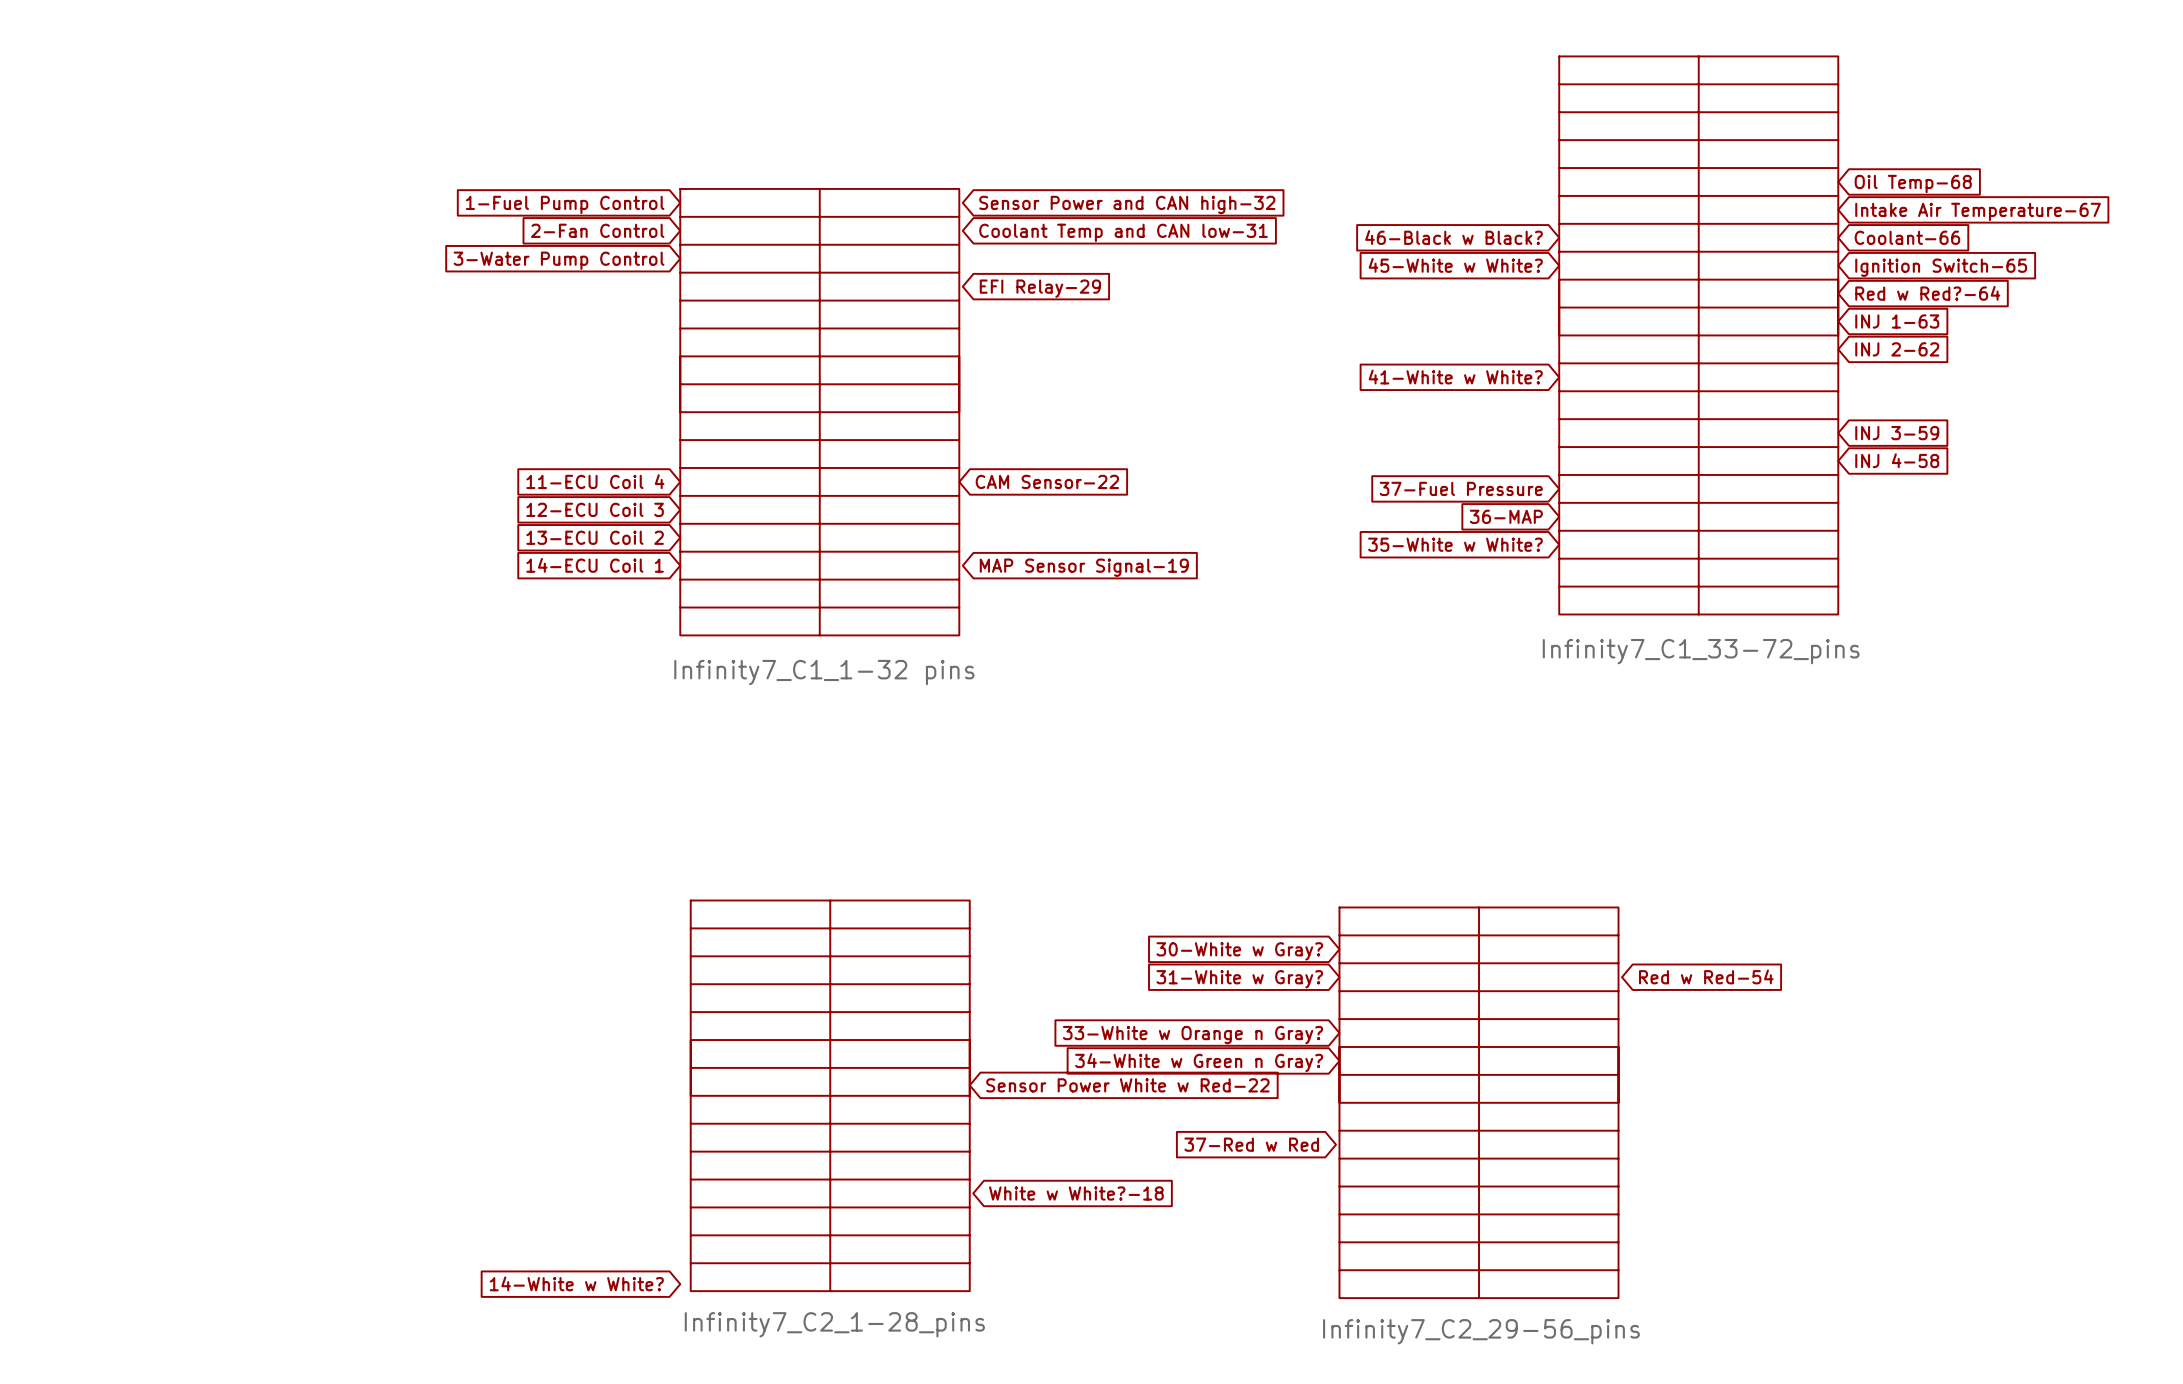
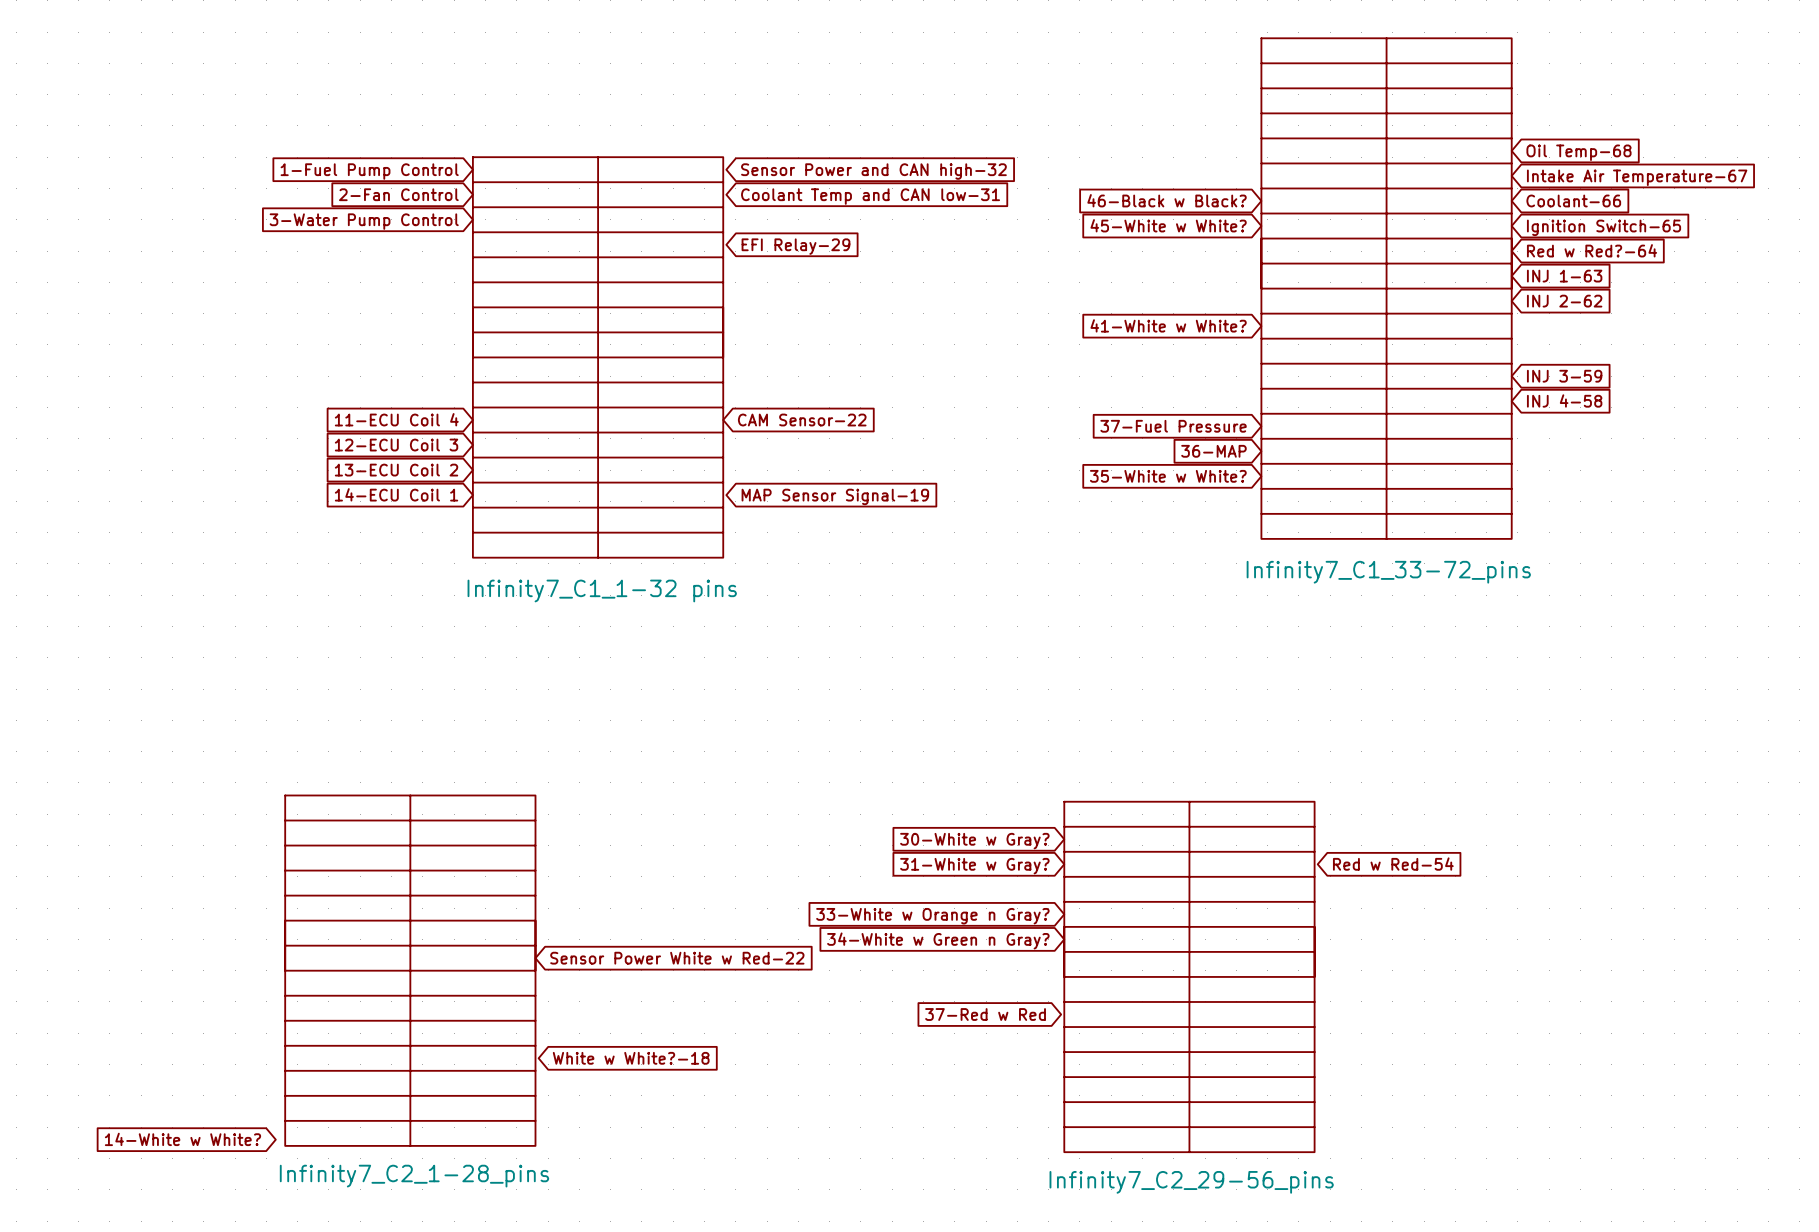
global label position: Sensor Power White w Red-22 (1127, 1085) -> Sensor Power White w Red-22 (677, 958)
part position: (830, 1095) -> (410, 970)
global label position: White w White?-18 (1076, 1193) -> White w White?-18 (631, 1058)
global label position: 14-White w White? (576, 1283) -> 14-White w White? (182, 1139)

